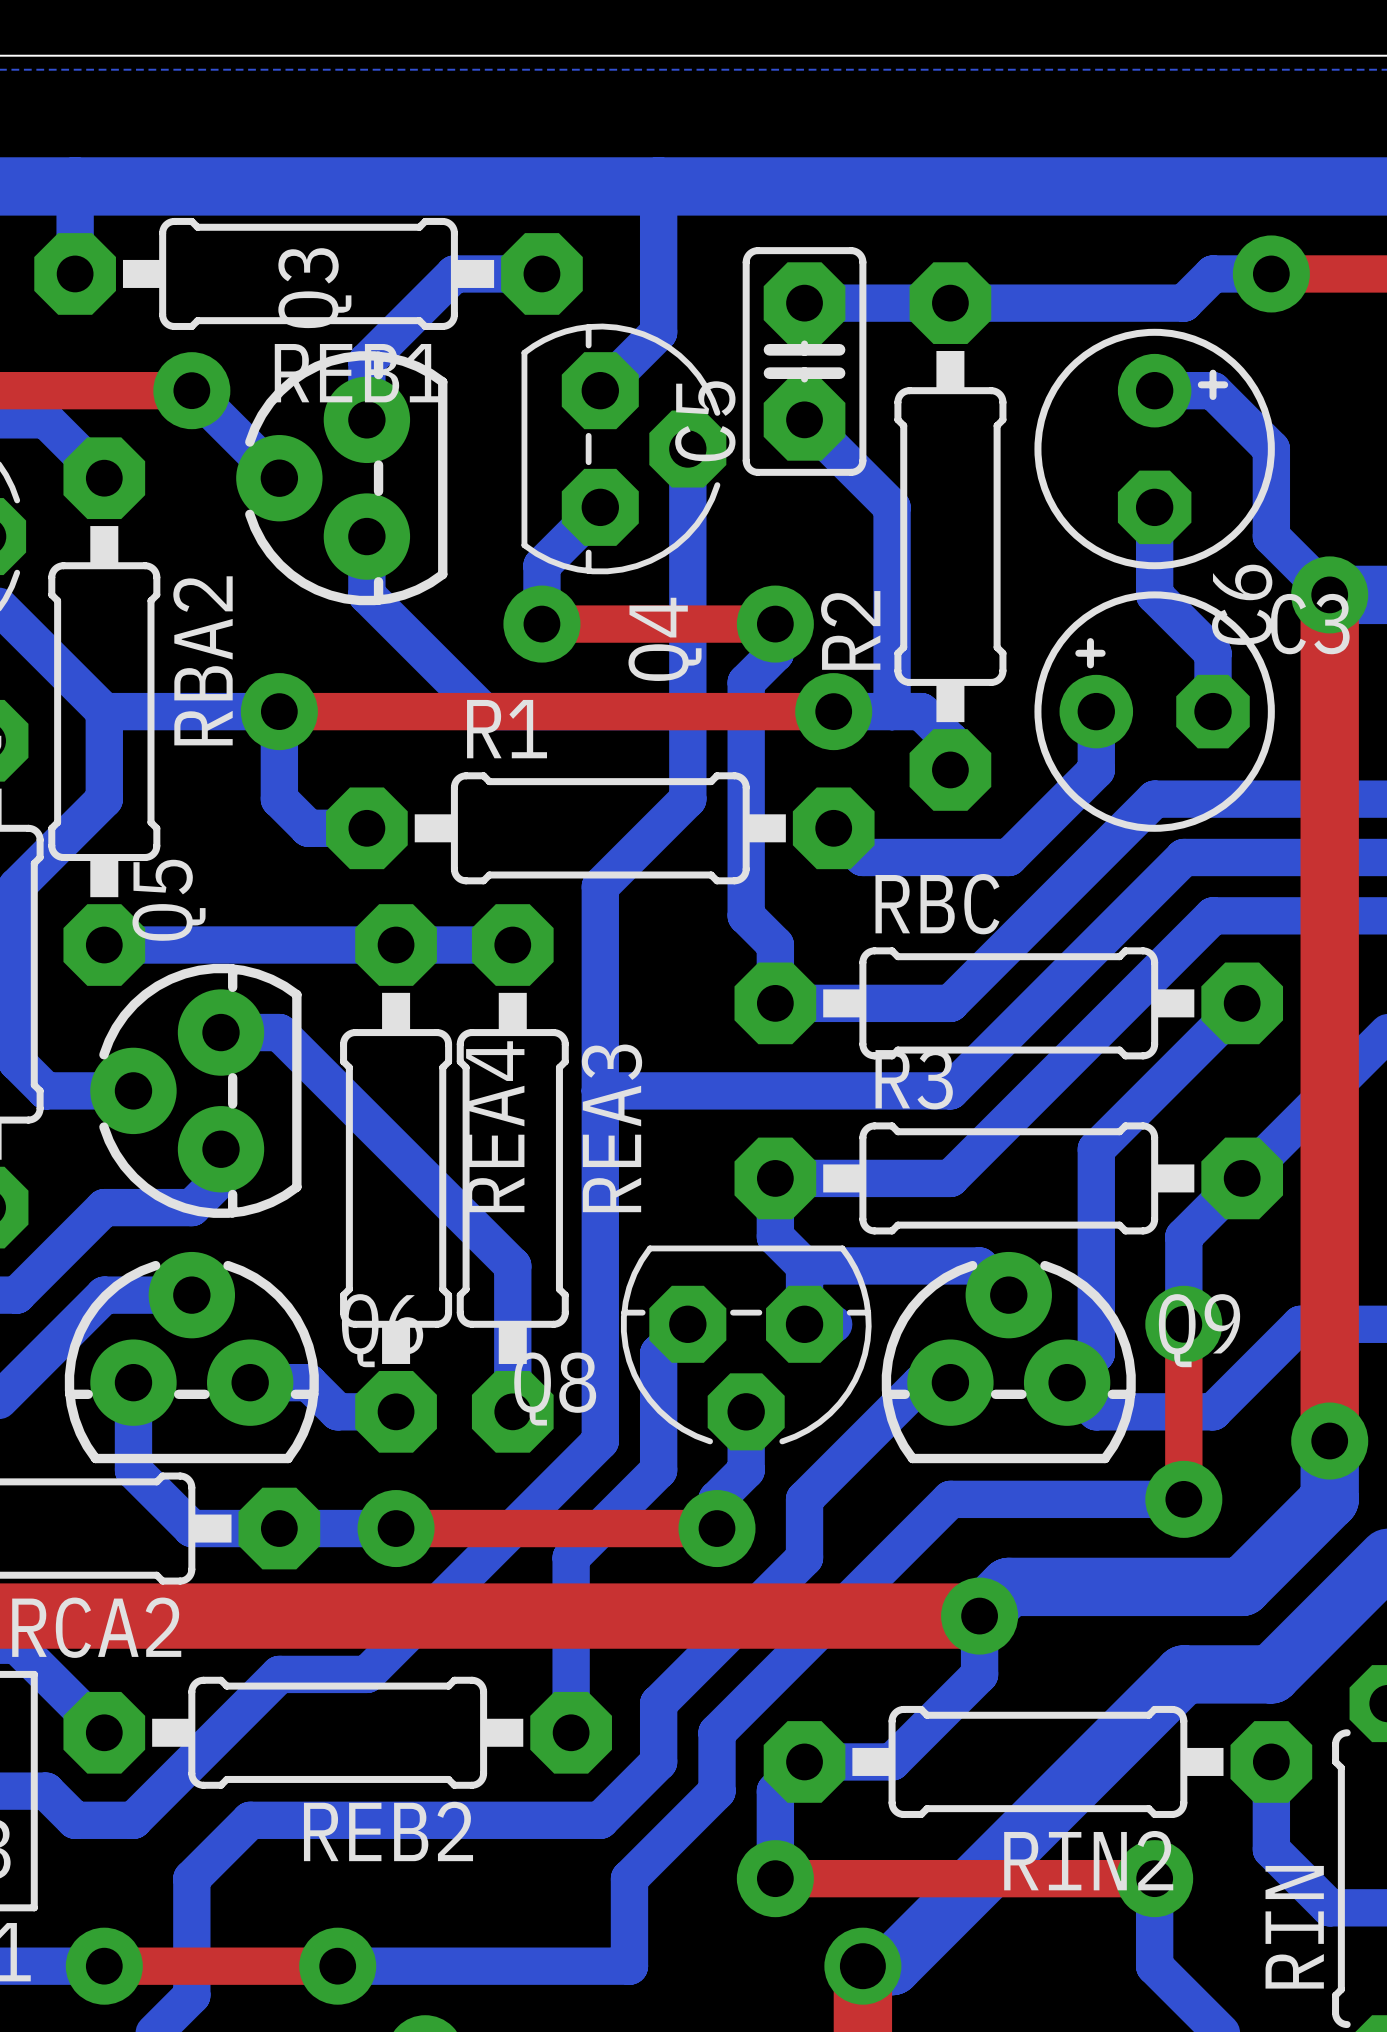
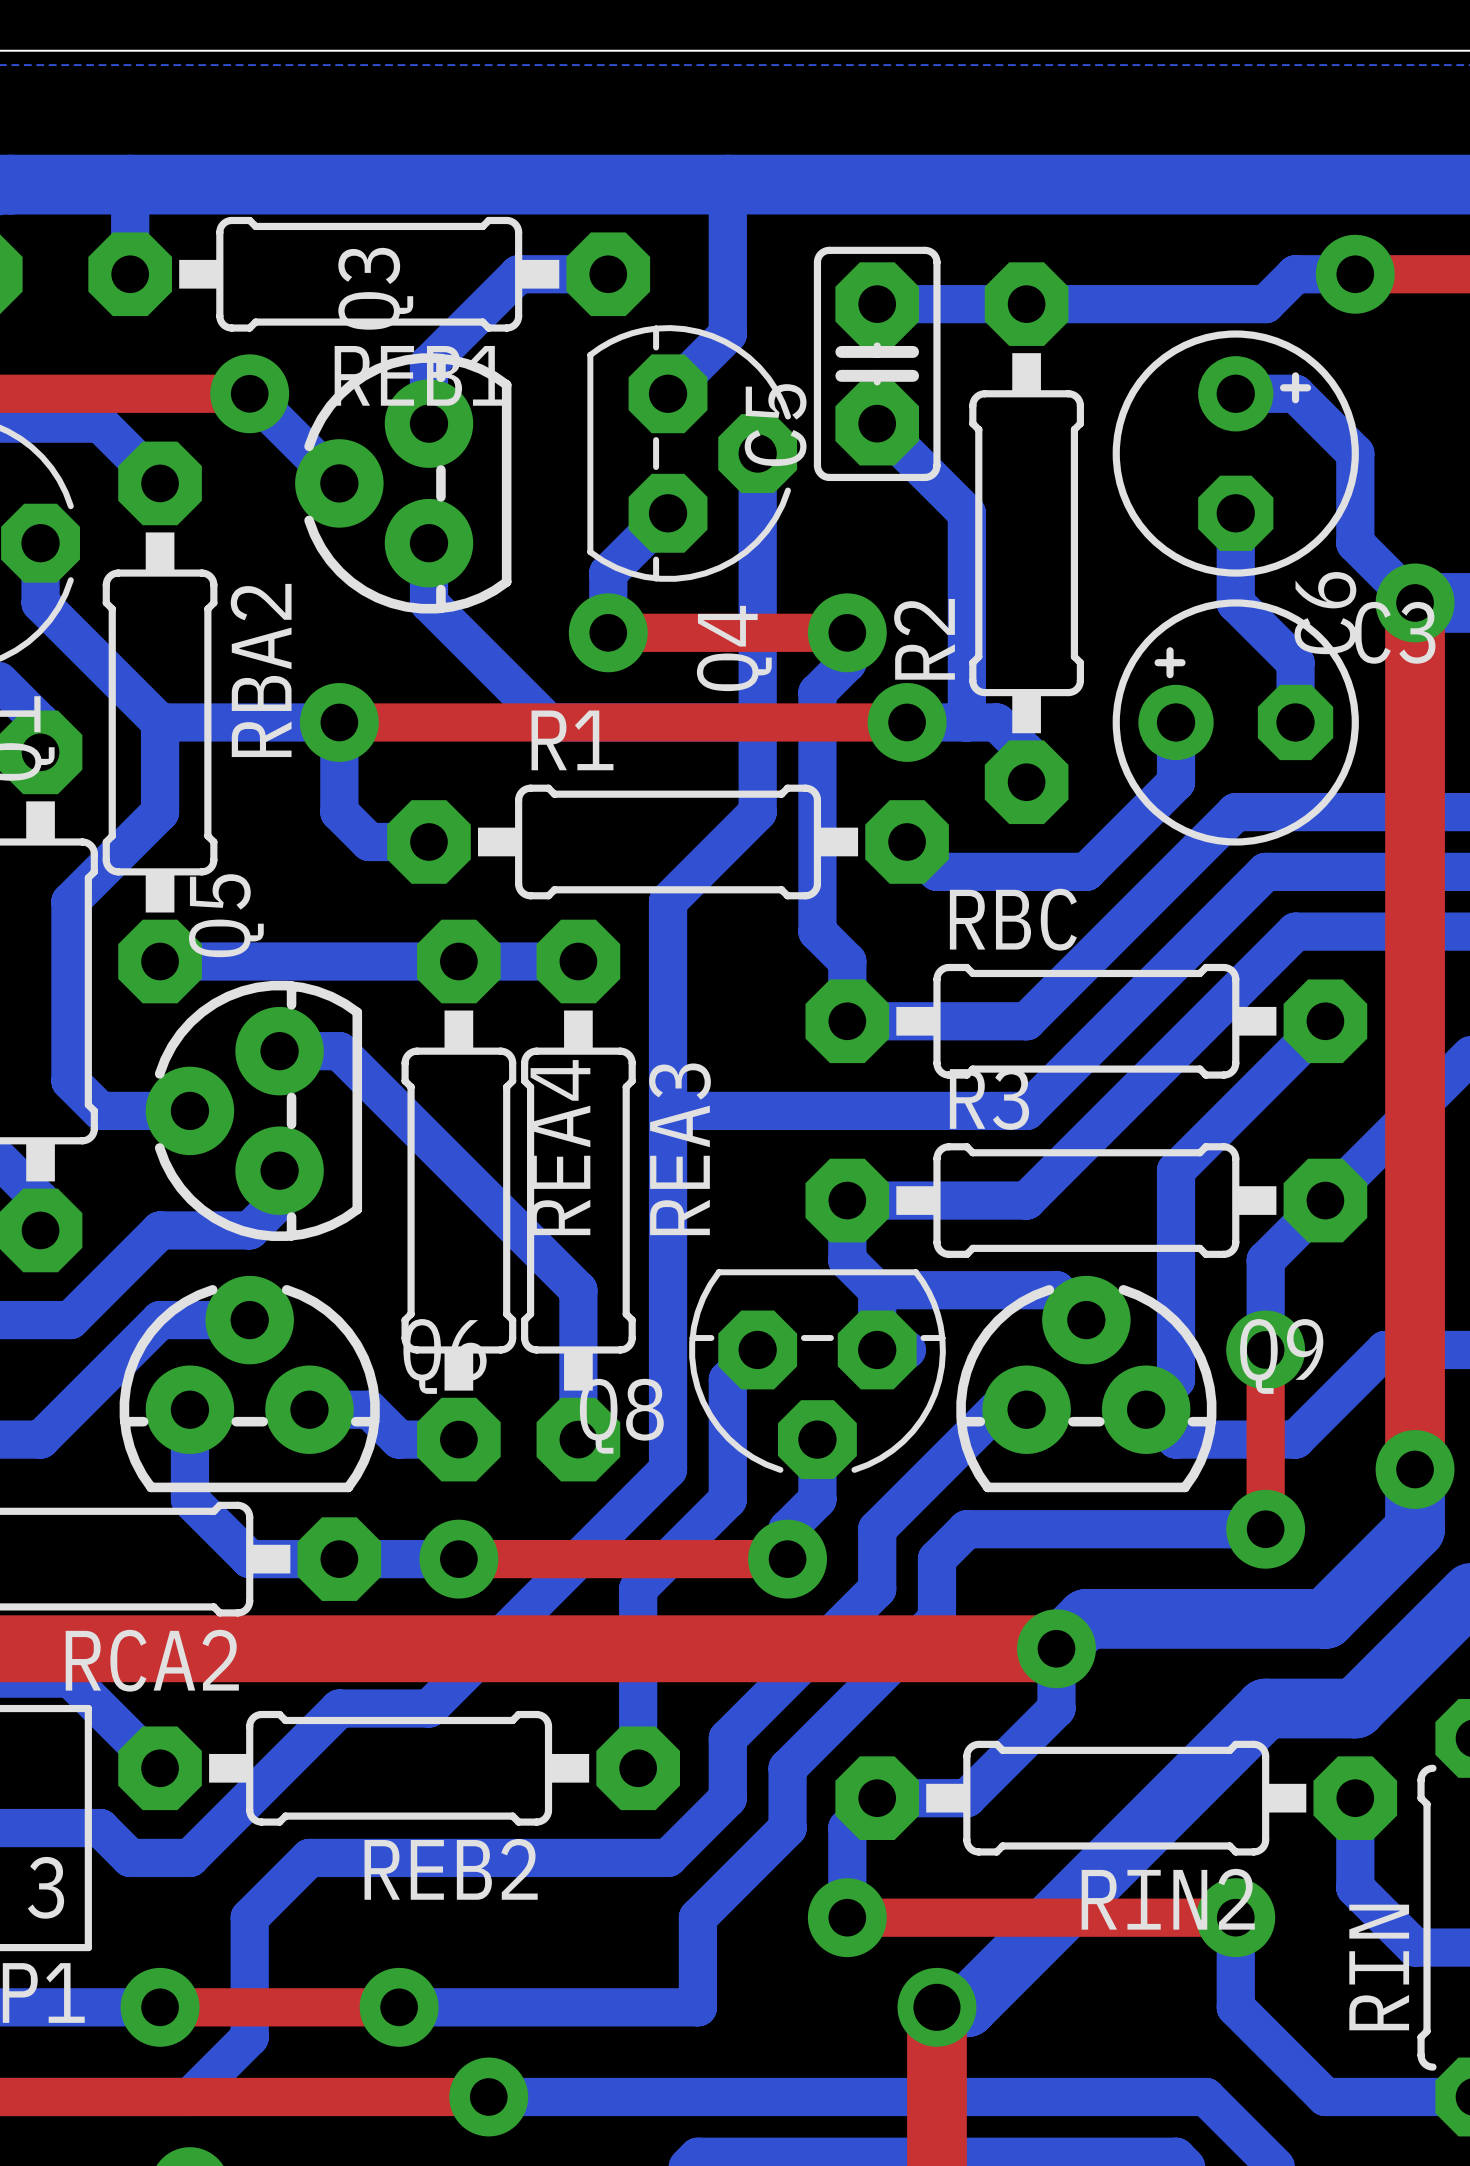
bottom track: (950, 1499) (862, 1586) -> (1026, 1529) (966, 1529) (936, 1559) (936, 1618)

